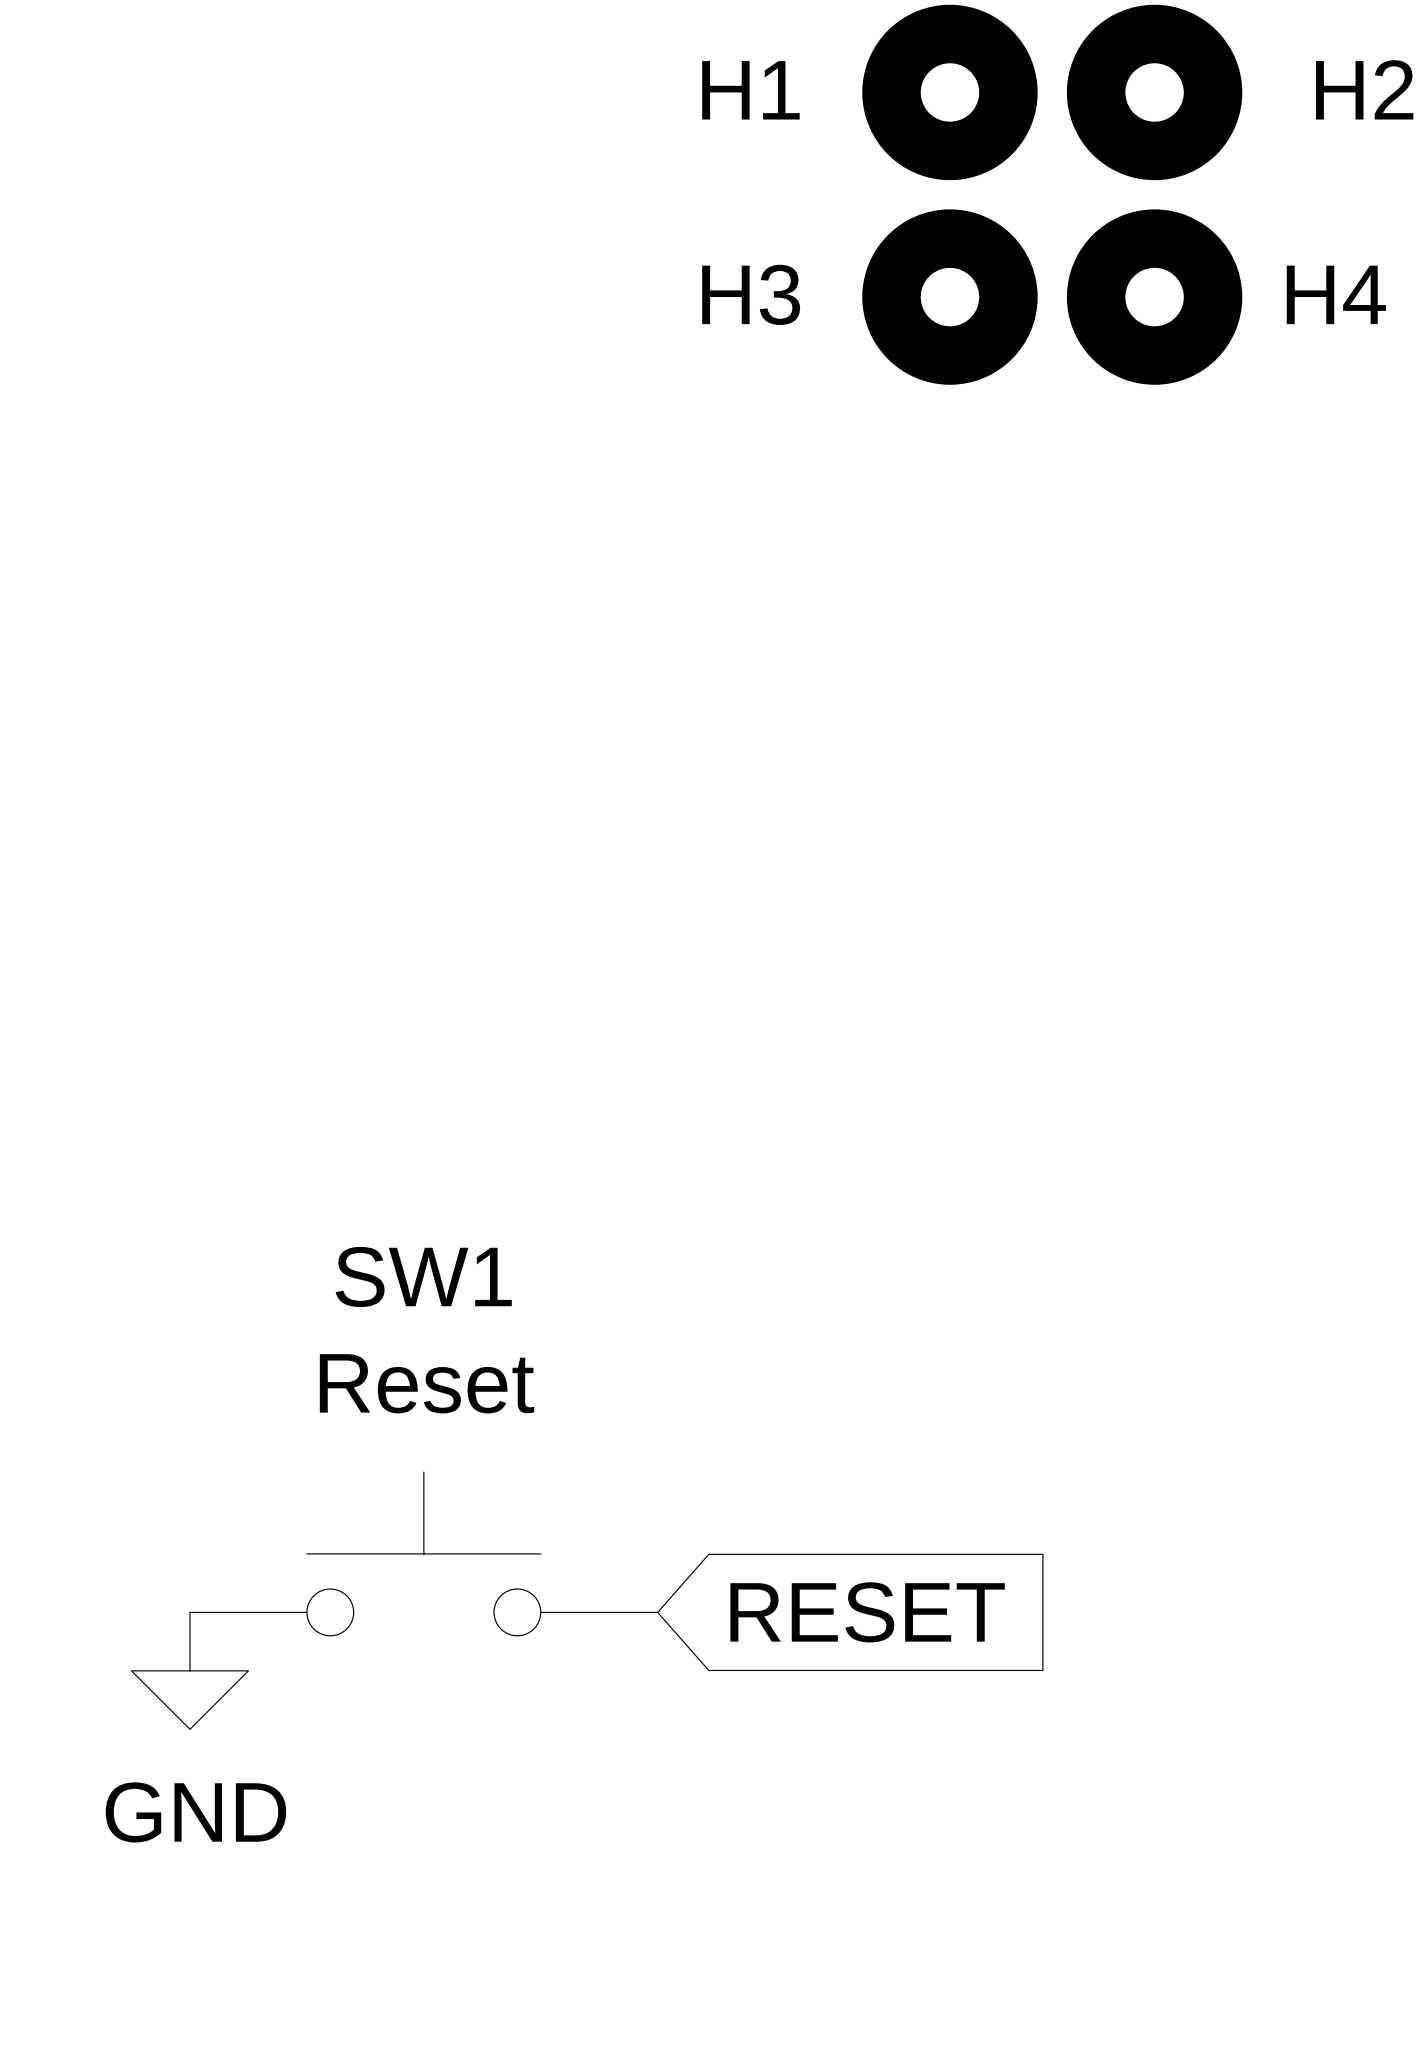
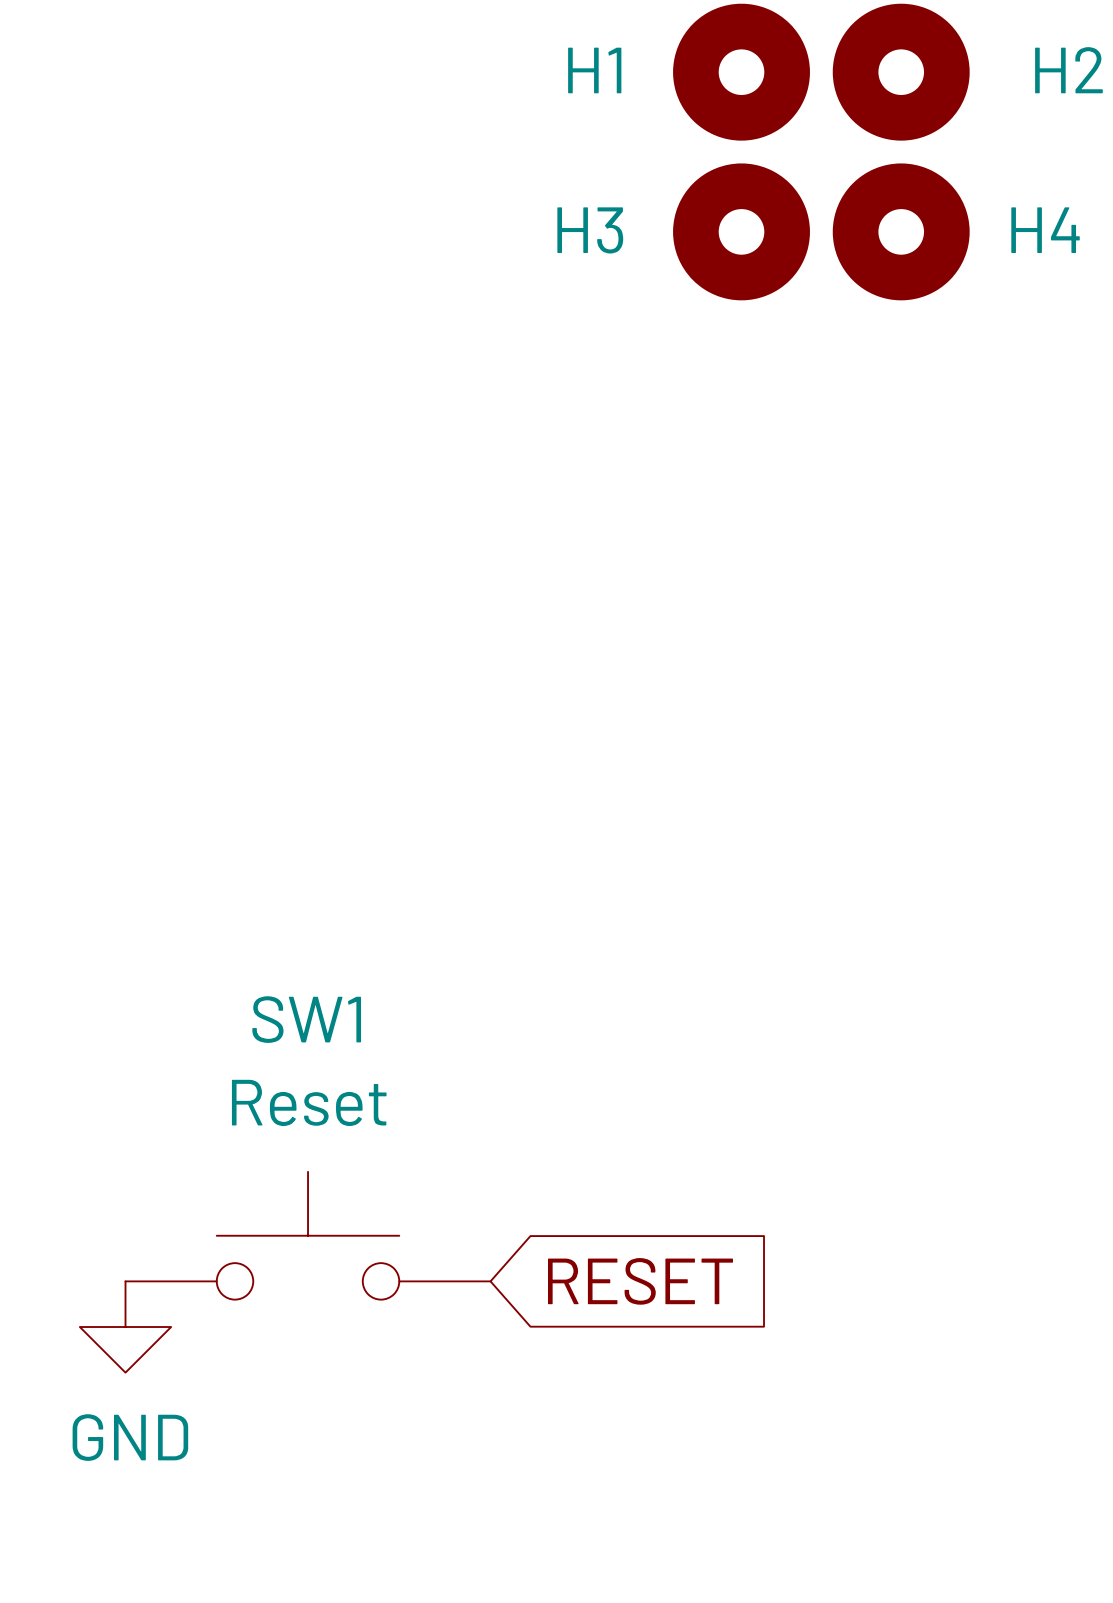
SW1 position: (423, 1553) -> (308, 1235)
global label position: RESET (867, 1612) -> RESET (640, 1281)
power symbol position: GND (190, 1670) -> GND (125, 1327)

